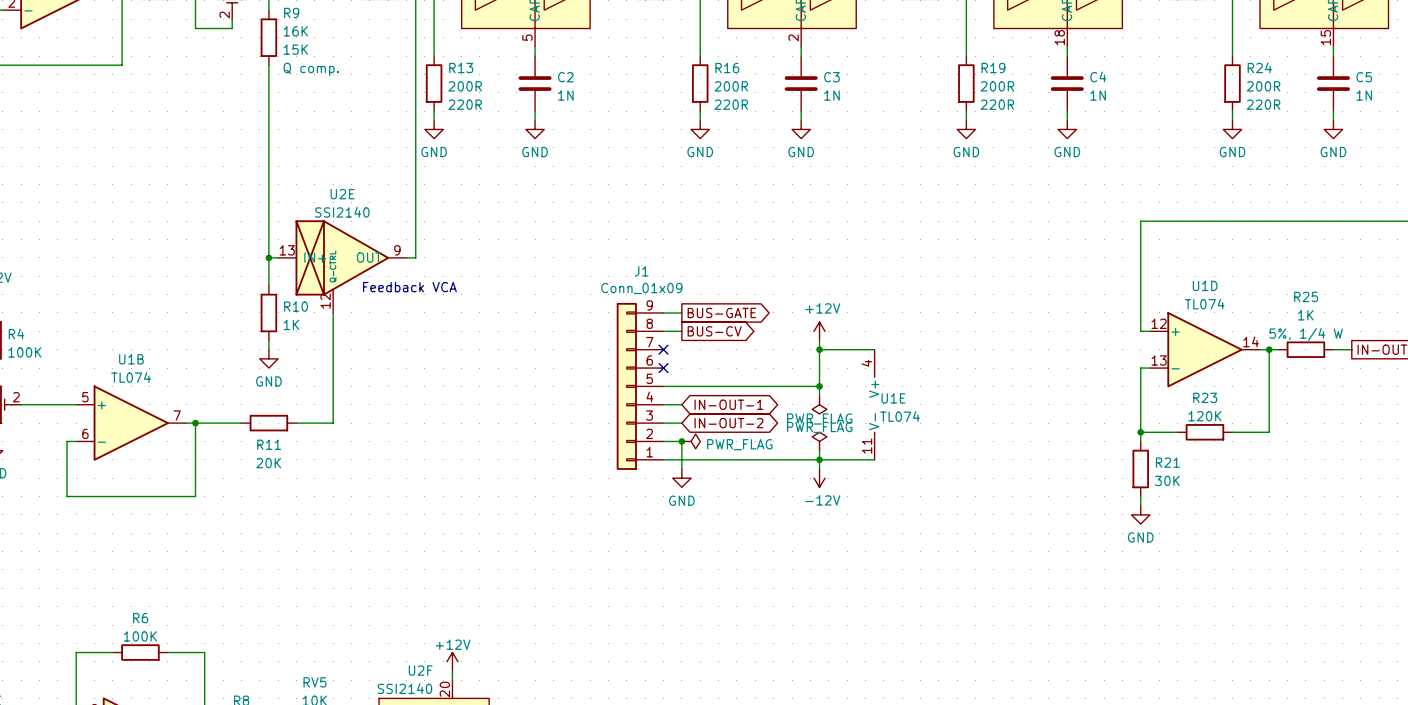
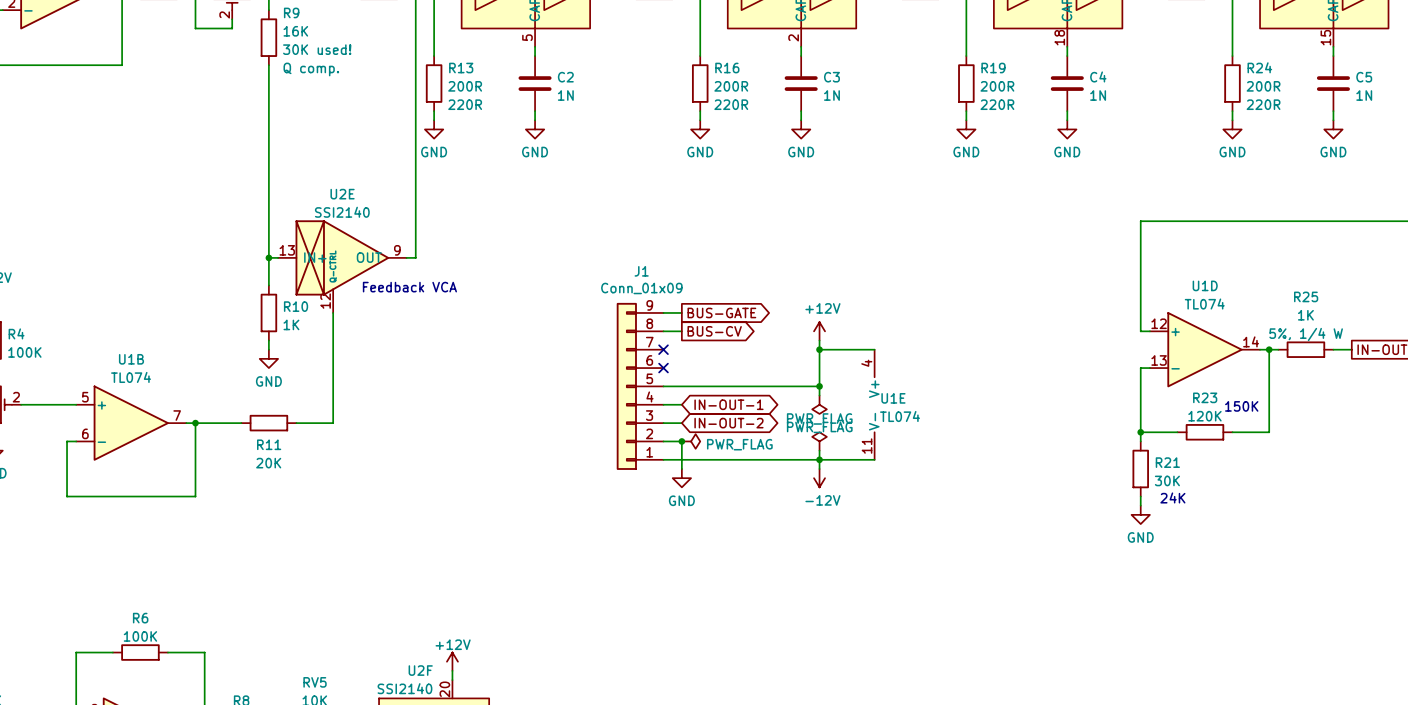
R9 text: 15K (295, 49) -> 30K used! (317, 49)
text: none -> 150K (1241, 406)
text: none -> 24K (1172, 497)

